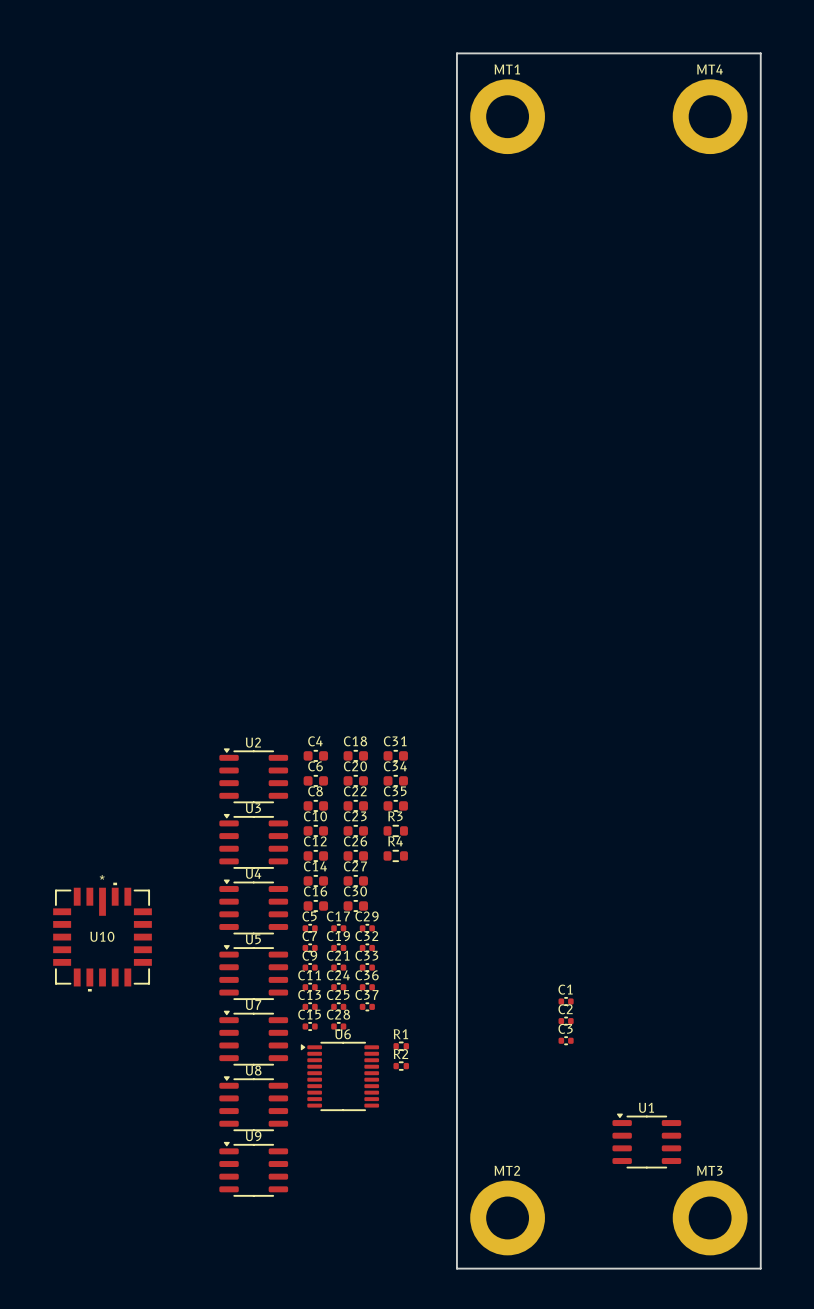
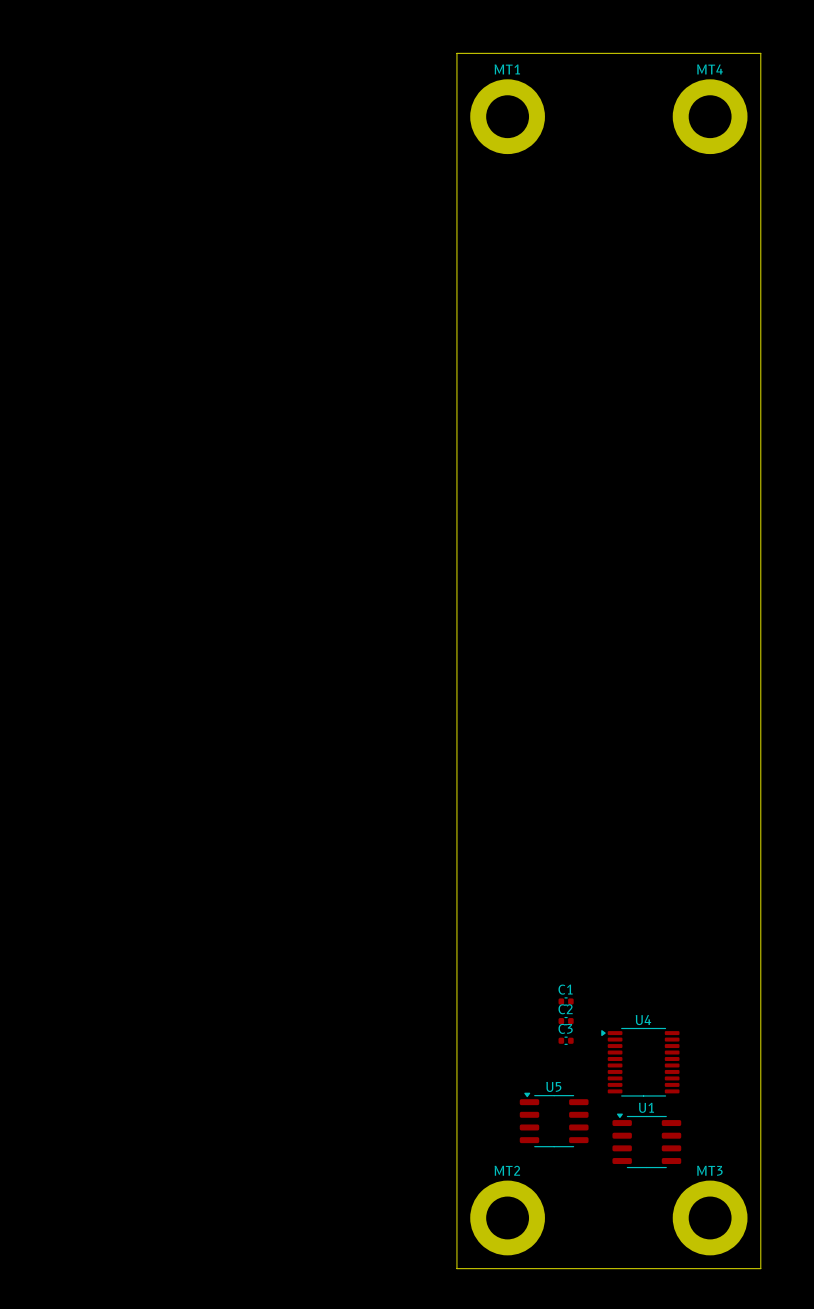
C4: (315, 755) -> none
C18: (355, 755) -> none
C31: (395, 755) -> none
U2: (253, 775) -> none
C6: (315, 780) -> none
C20: (355, 780) -> none
C34: (395, 780) -> none
C8: (315, 805) -> none
C22: (355, 805) -> none
C35: (395, 805) -> none
C10: (315, 830) -> none
C23: (355, 830) -> none
R3: (395, 830) -> none
U3: (253, 841) -> none
C12: (315, 855) -> none
C26: (355, 855) -> none
R4: (395, 855) -> none
U4 footprint: [219, 879, 289, 935] -> [601, 1027, 680, 1097]
C14: (315, 880) -> none
C27: (355, 880) -> none
C16: (315, 906) -> none
C30: (355, 906) -> none
C5: (310, 928) -> none
C17: (338, 928) -> none
C29: (367, 928) -> none
U10: (102, 937) -> none
C7: (310, 947) -> none
C19: (338, 947) -> none
C32: (367, 947) -> none
C9: (310, 967) -> none
C21: (338, 967) -> none
C33: (367, 967) -> none
U5 position: (253, 972) -> (554, 1119)
C11: (310, 987) -> none
C24: (338, 987) -> none
C36: (367, 987) -> none
C13: (310, 1006) -> none
C25: (338, 1006) -> none
C37: (367, 1006) -> none
C15: (310, 1026) -> none
C28: (338, 1026) -> none
U7: (253, 1037) -> none
R1: (401, 1046) -> none
R2: (401, 1066) -> none
U6: (339, 1076) -> none
U8: (253, 1103) -> none
U9: (253, 1169) -> none

